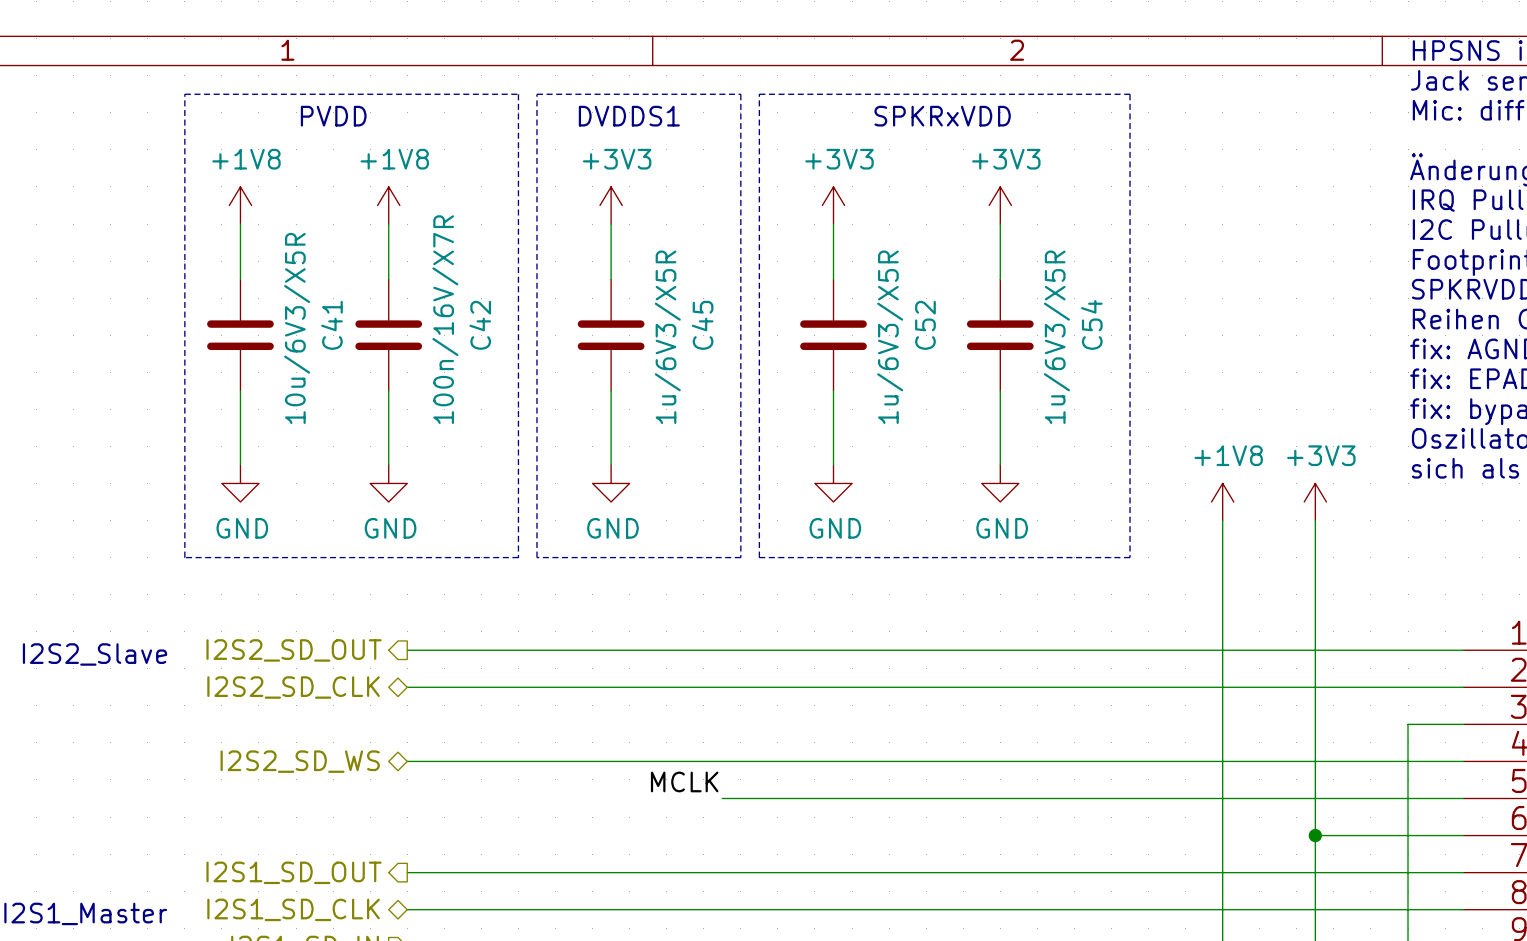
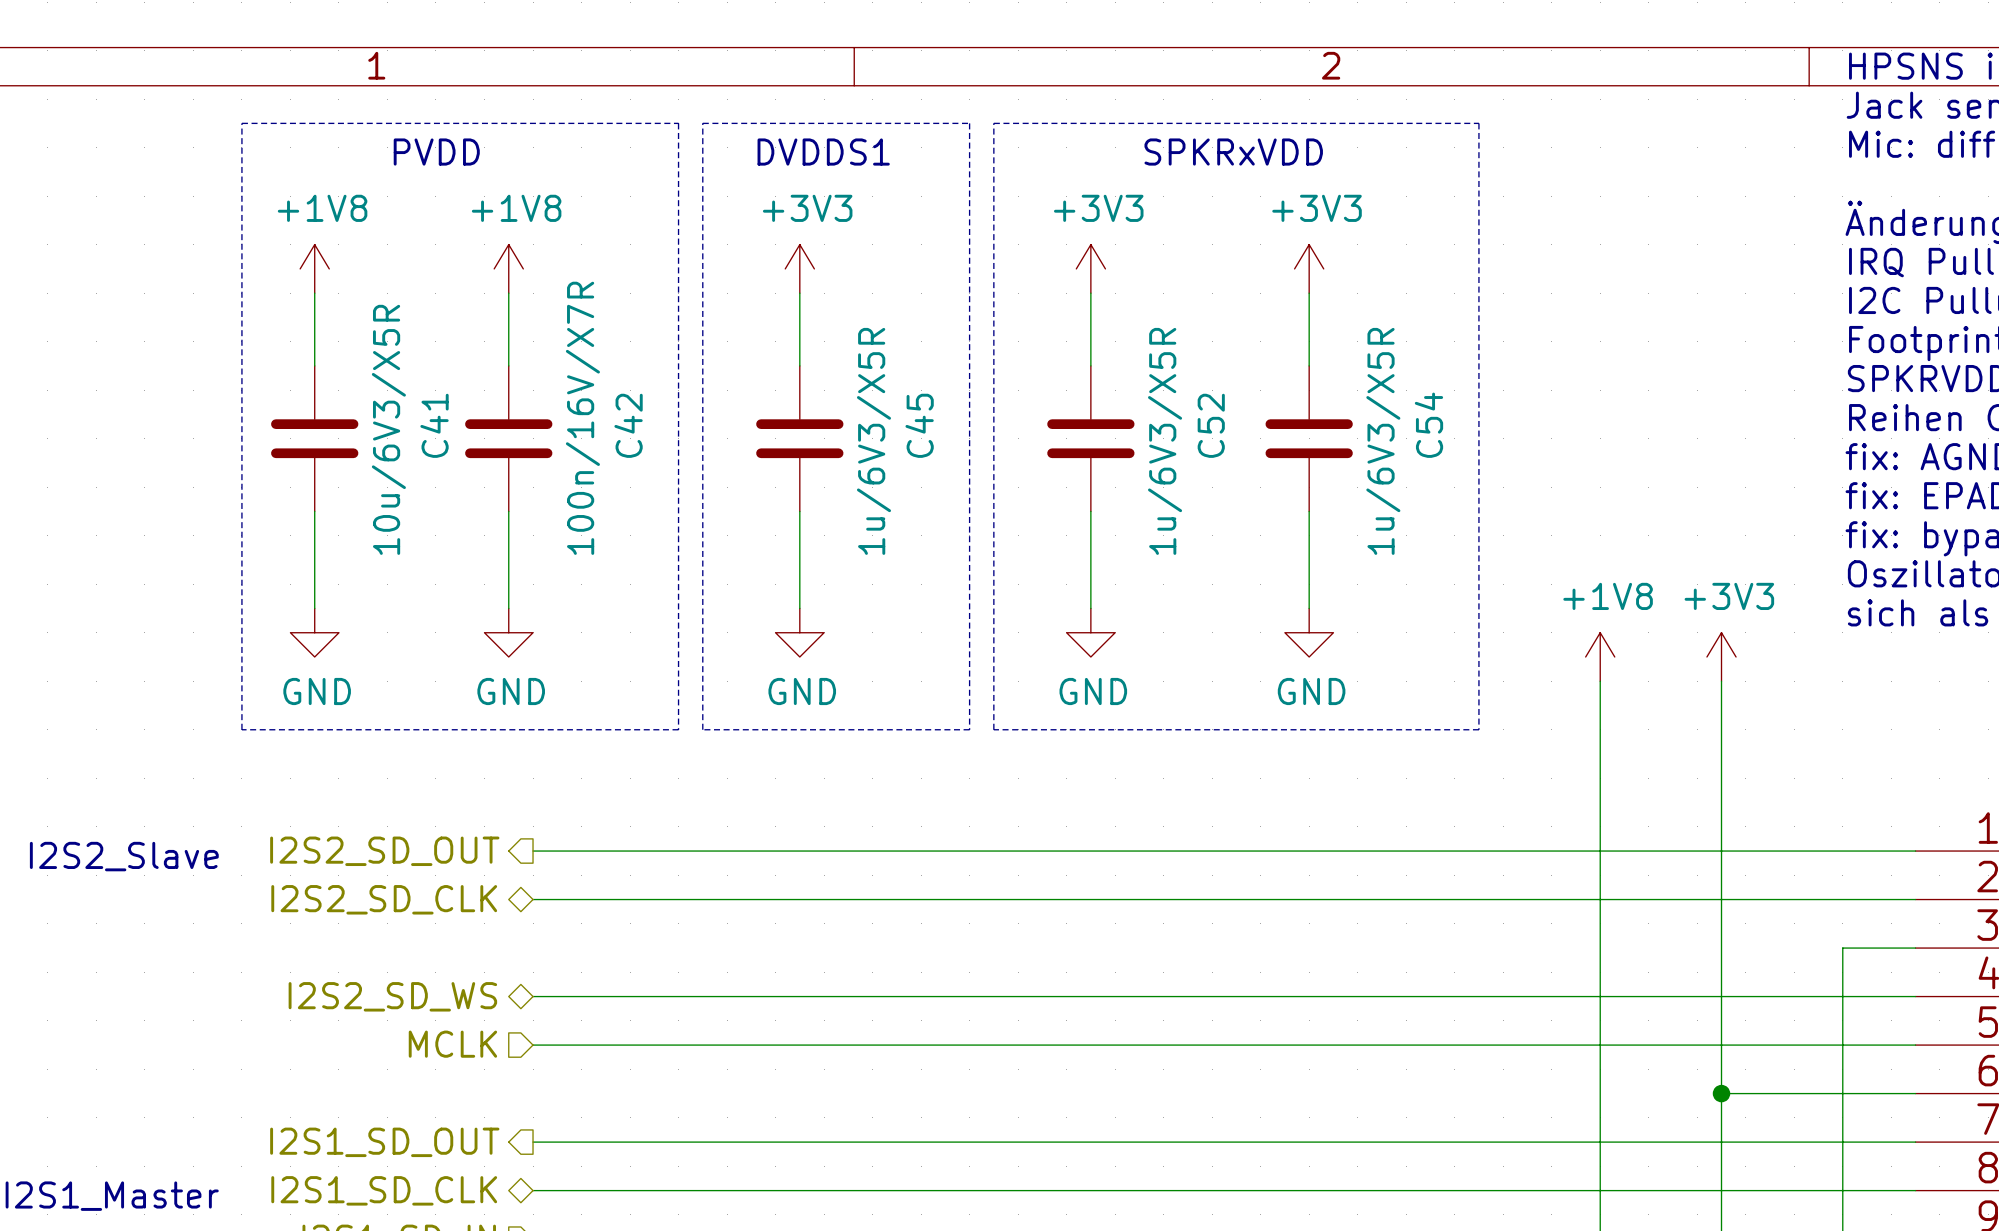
label: MCLK (684, 781) -> none
hierarchical label: none -> MCLK (452, 1044)
wire: none -> (533, 1045) (945, 1045)

